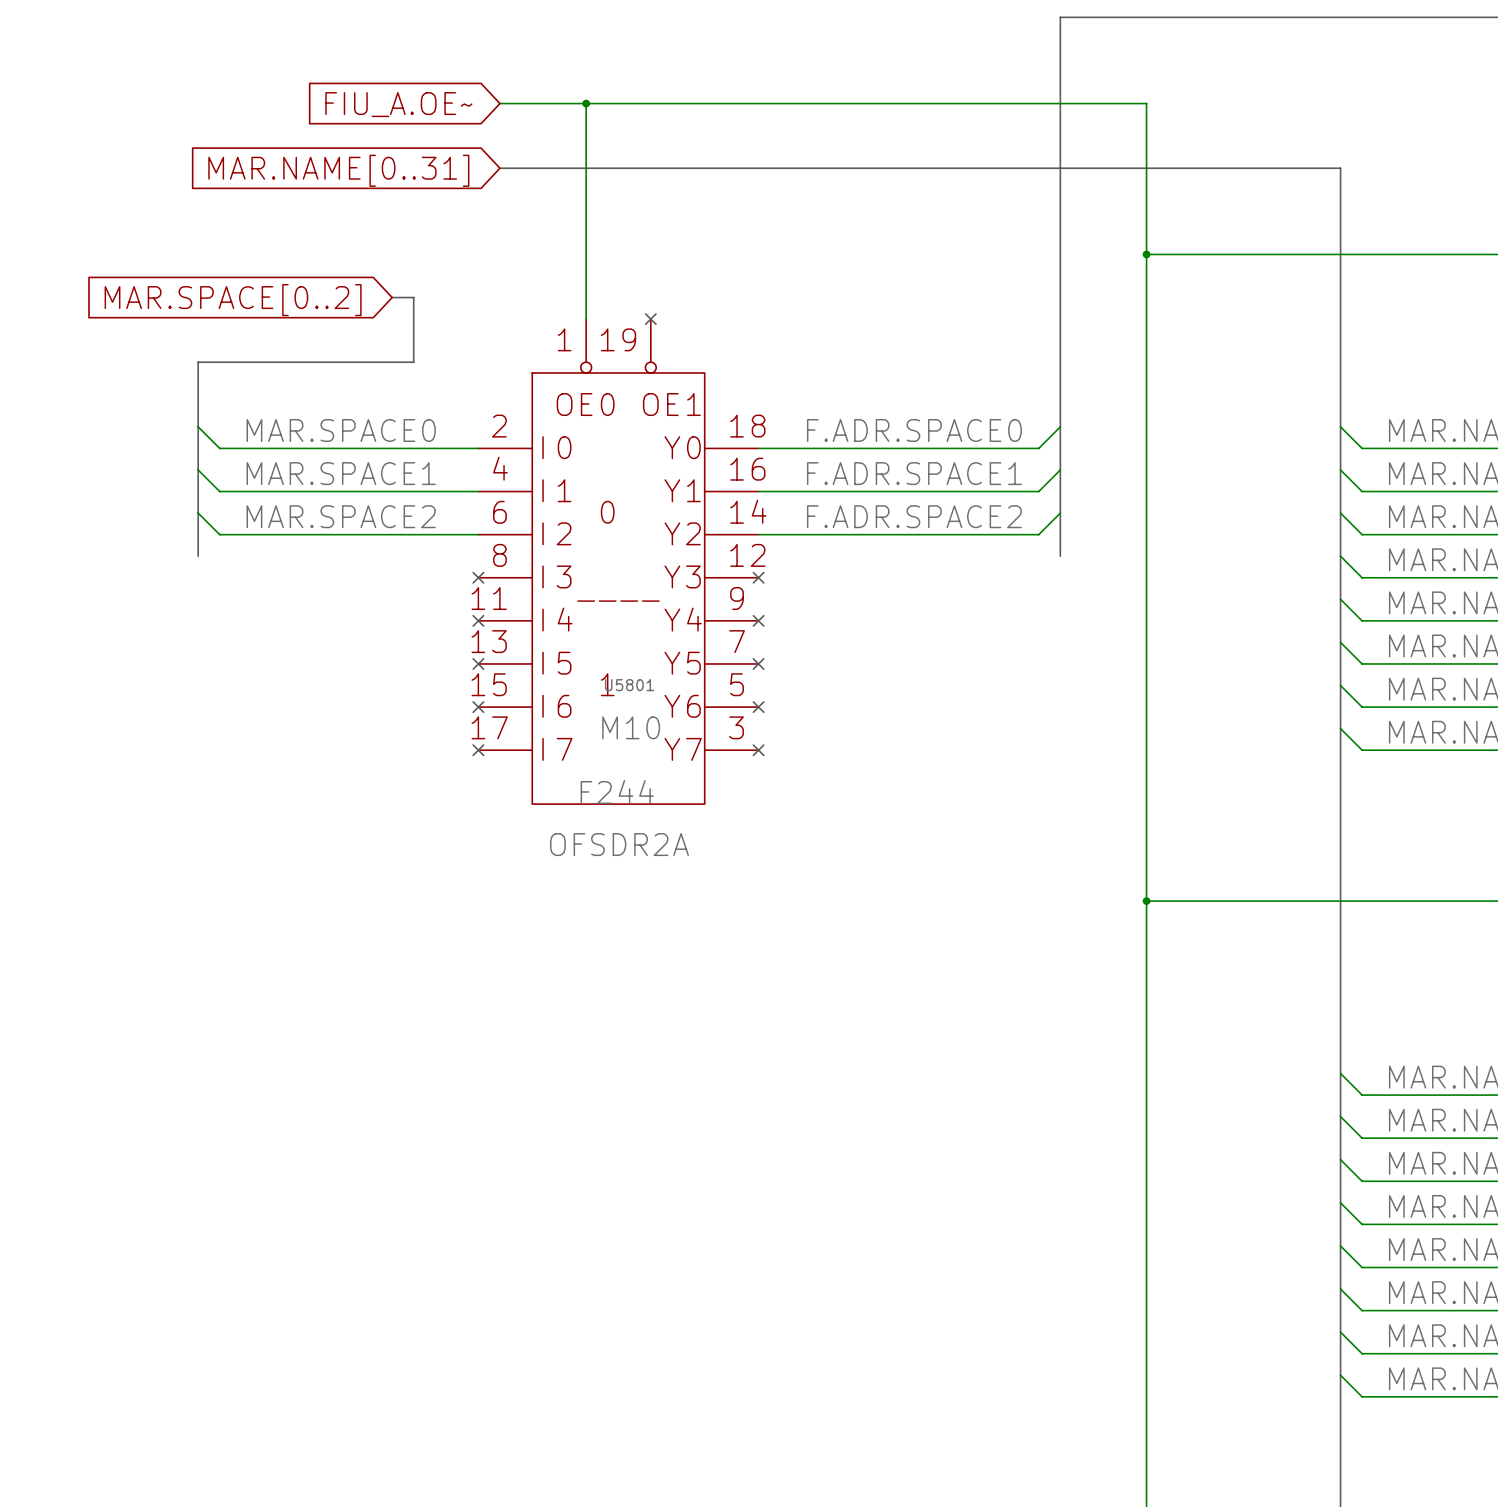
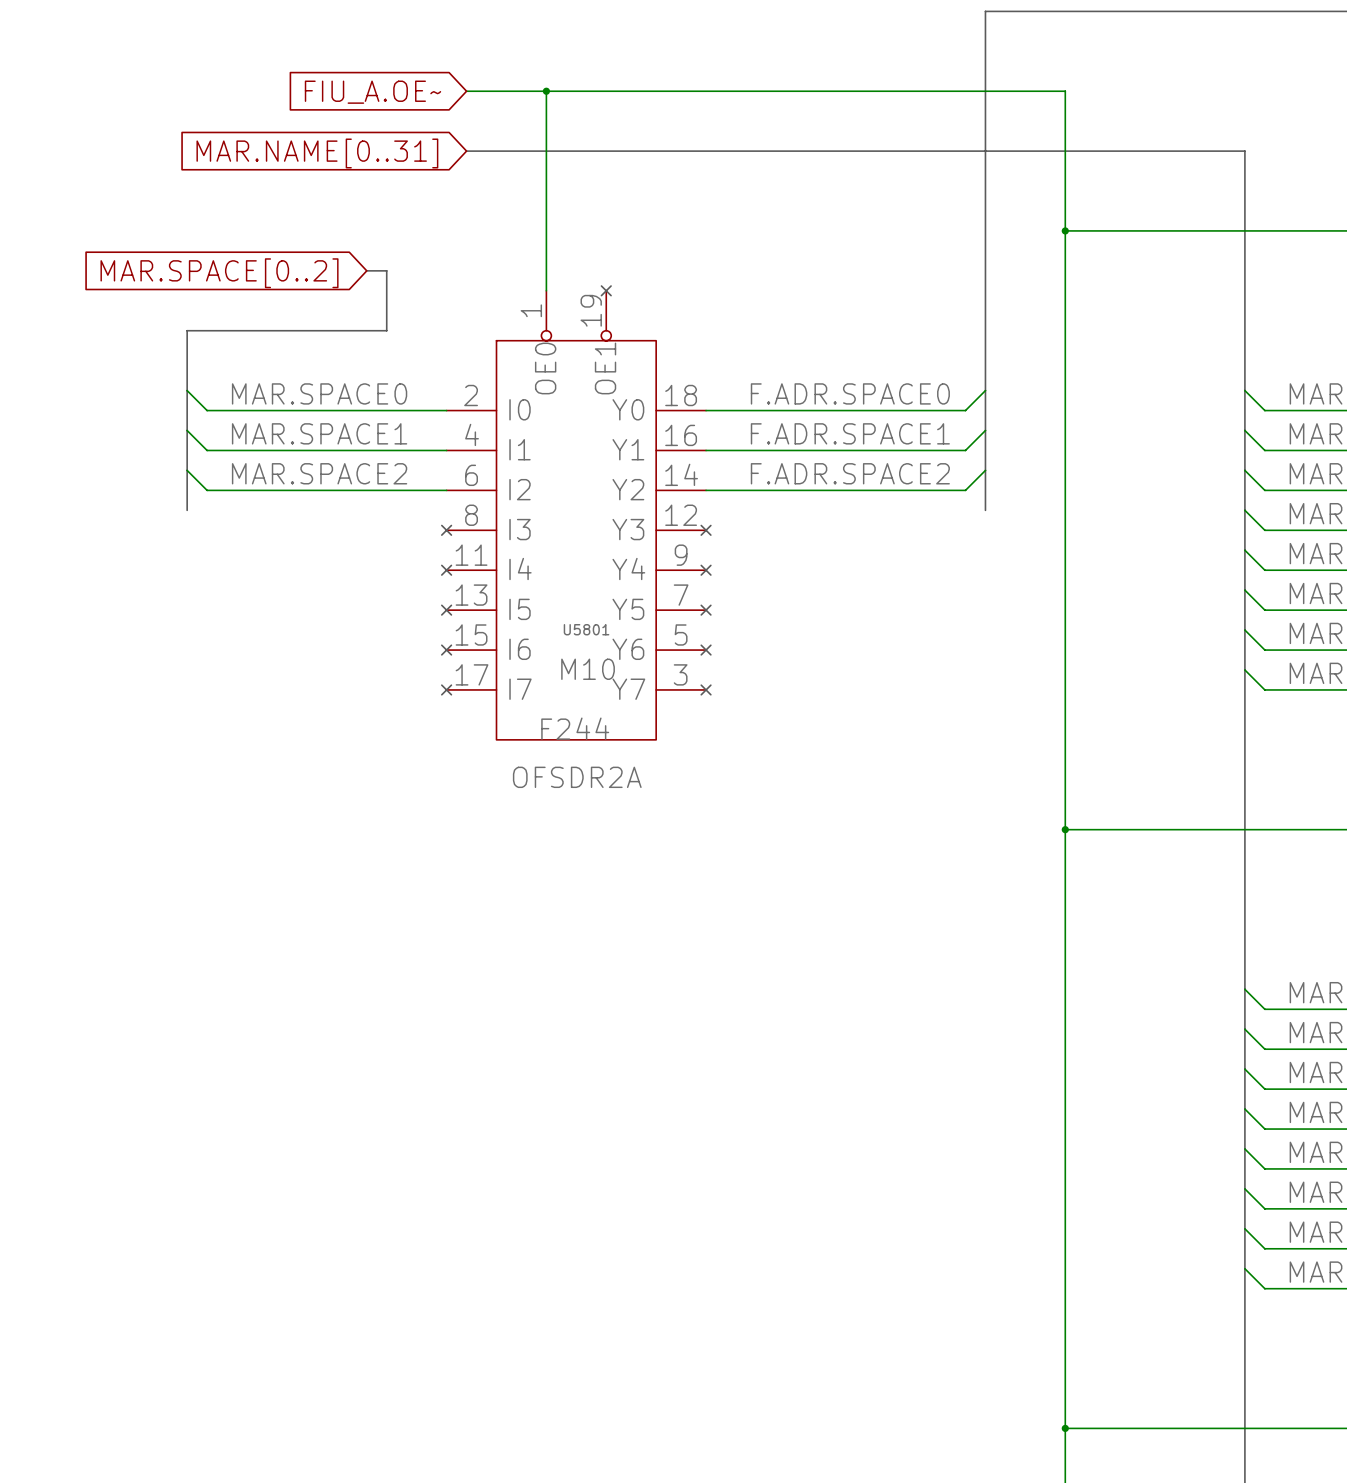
U5801 symbol: [478, 319, 759, 805] -> [446, 290, 707, 740]

